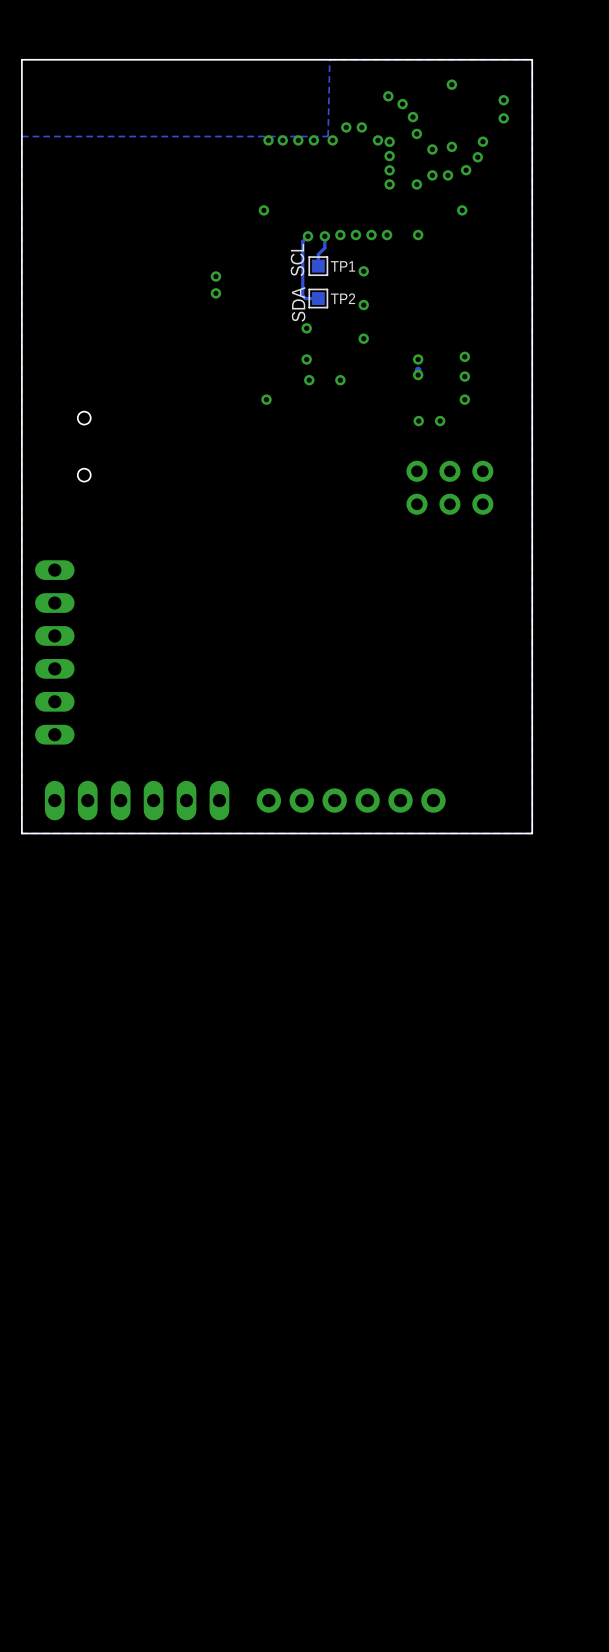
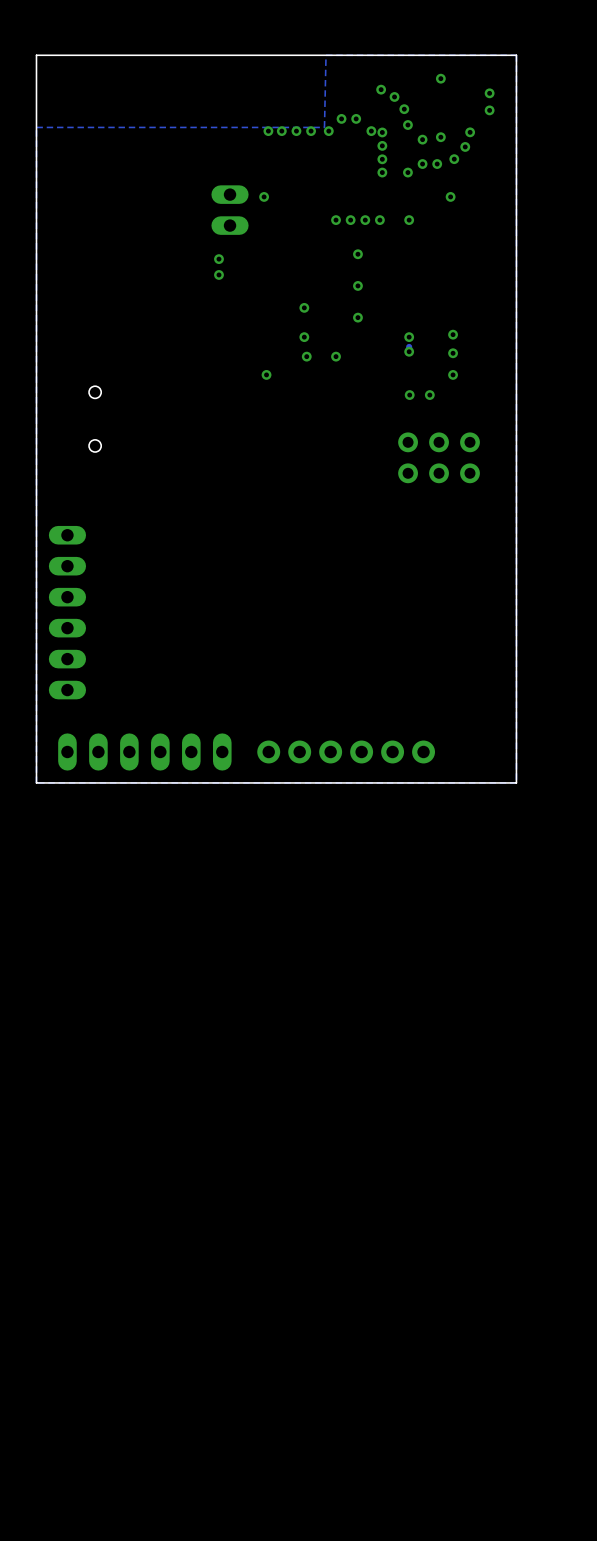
part: none -> (230, 210)
track: (307, 236) (302, 241) (302, 295) (305, 298) (318, 298) -> none
via: (307, 236) -> none
track: (324, 236) (324, 247) (318, 254) (318, 266) -> none
via: (324, 236) -> none
TP1: SCL (318, 266) -> none
TP2: SDA (318, 298) -> none

